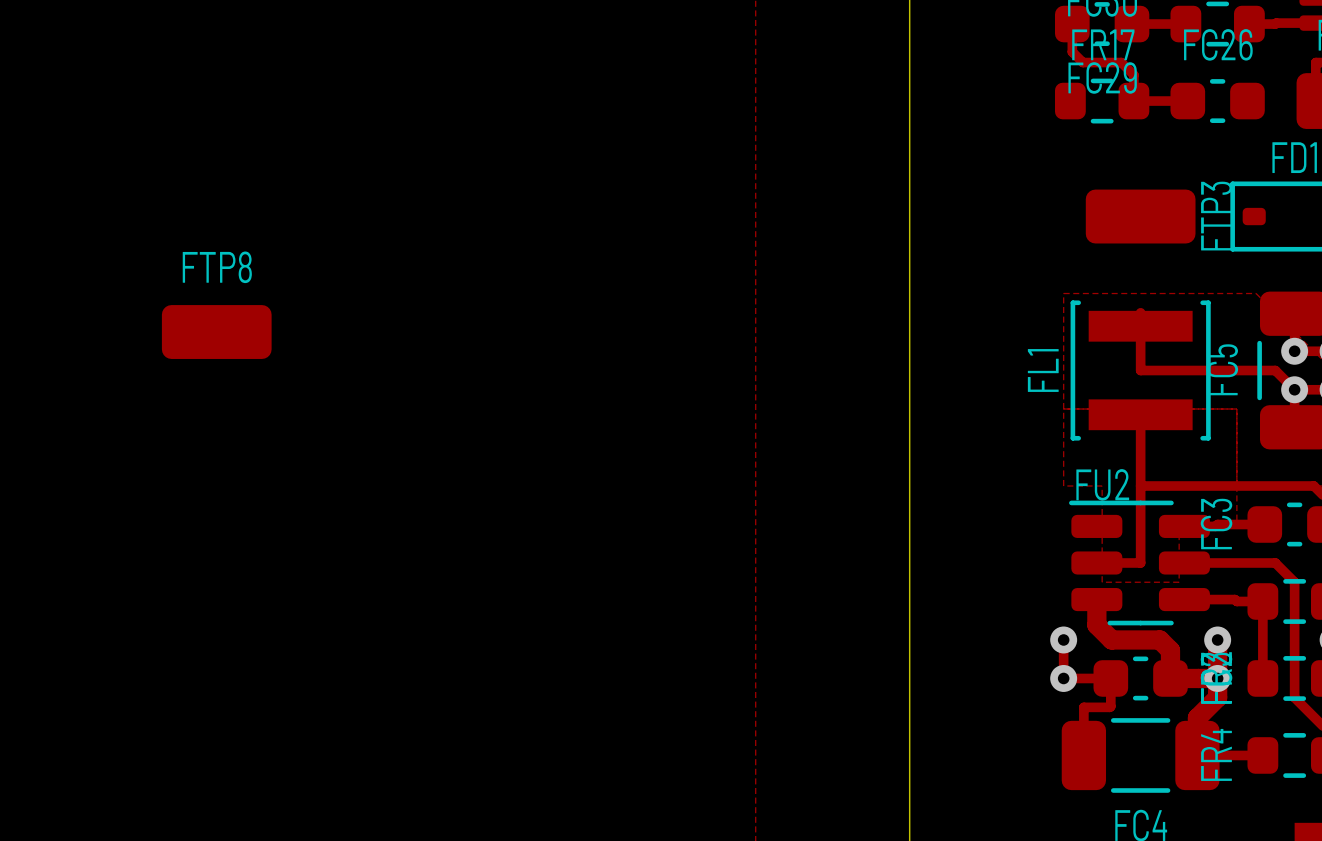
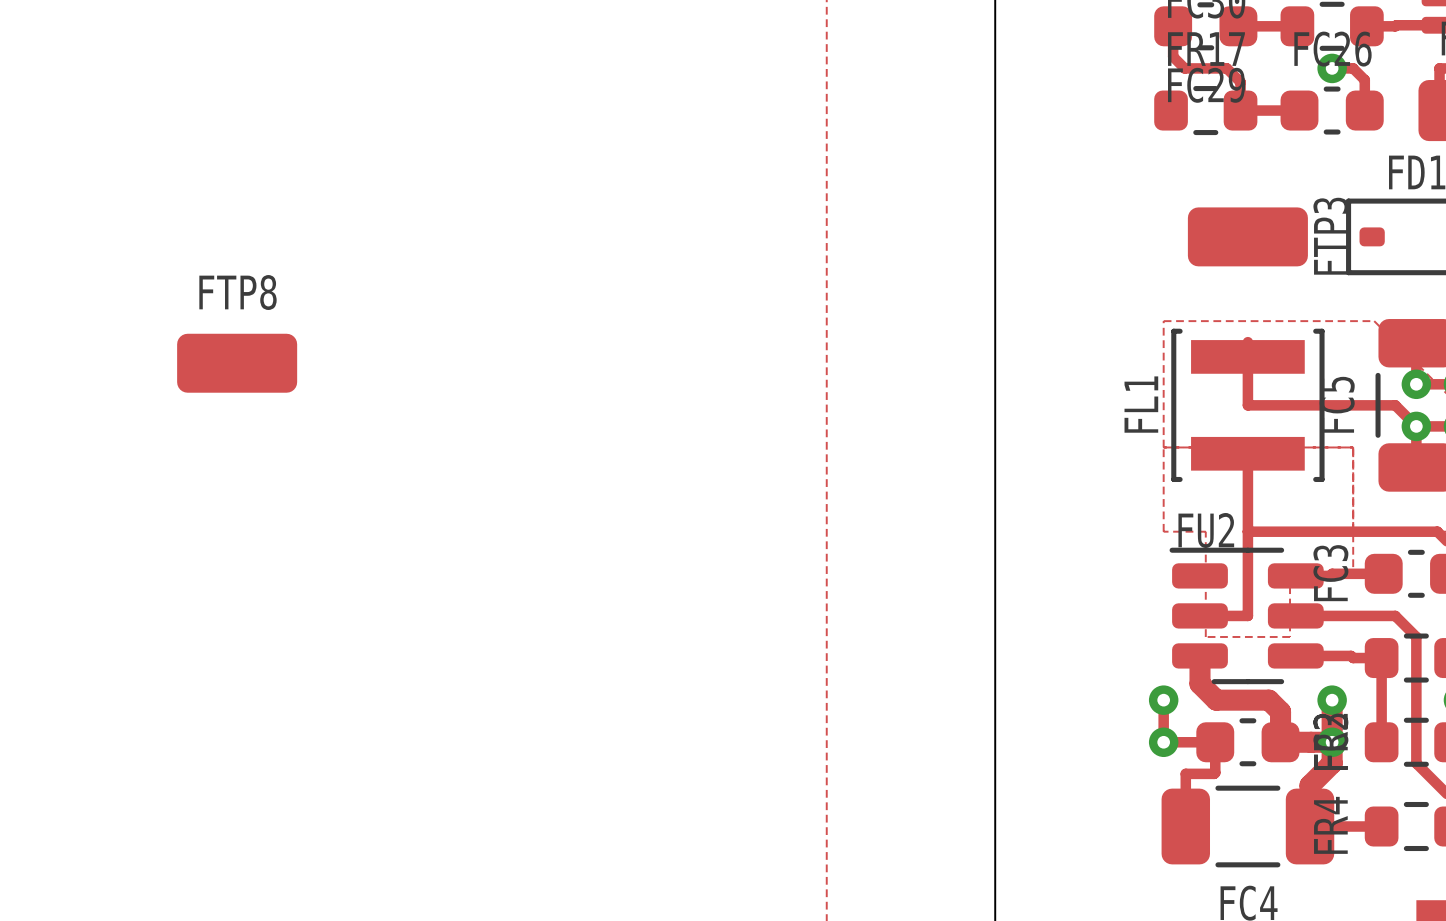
track: none -> (1332, 68) (1353, 68) (1364, 80) (1364, 110)
via: none -> (1332, 68)

